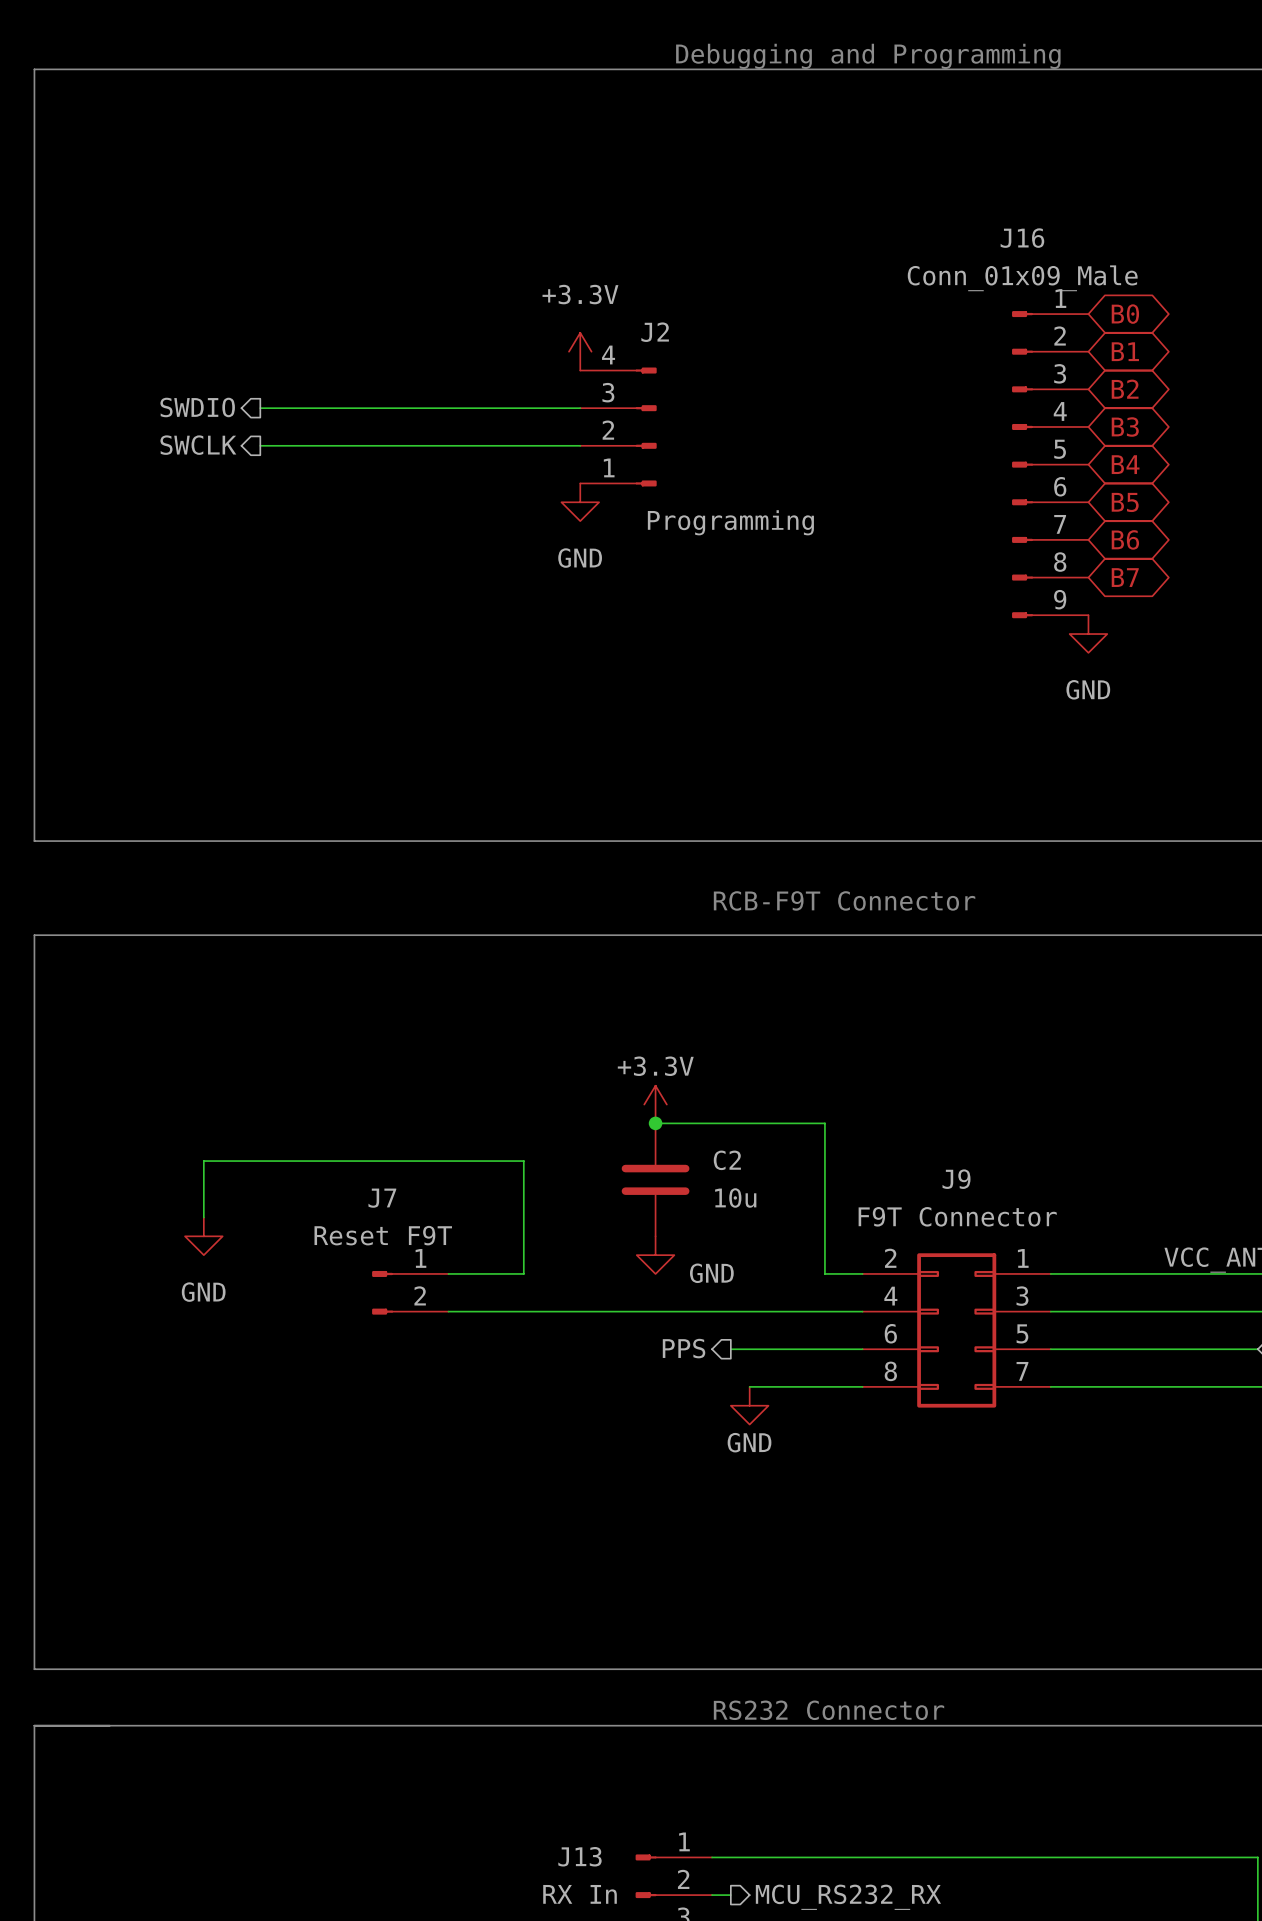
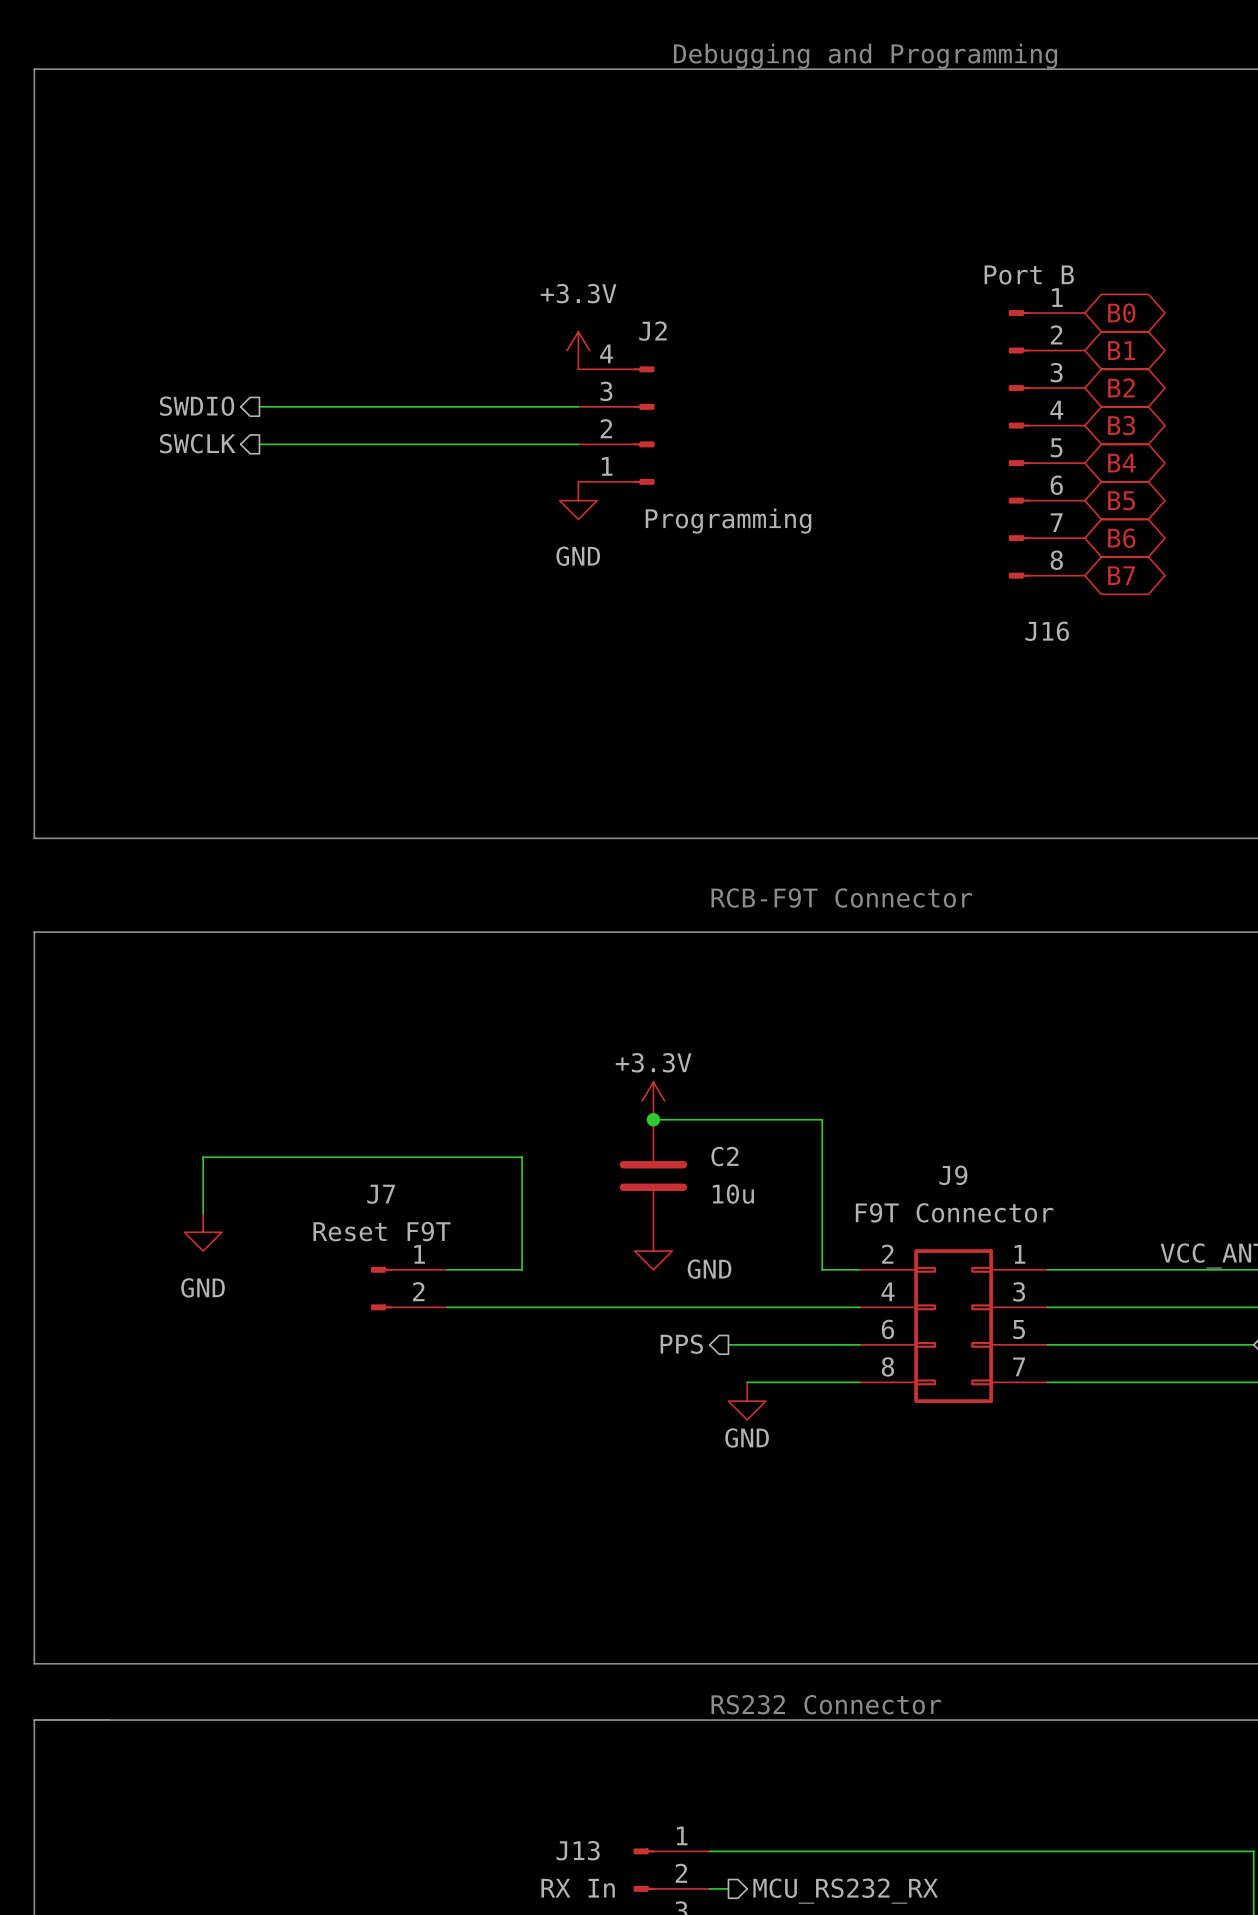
J16 name position: J16 (1022, 238) -> J16 (1047, 631)
J16 value: Conn_01x09_Male (1022, 278) -> Port B (1029, 275)
J16 symbol: [1012, 311, 1089, 619] -> [1008, 310, 1085, 579]
power symbol: GND (1088, 634) -> none

